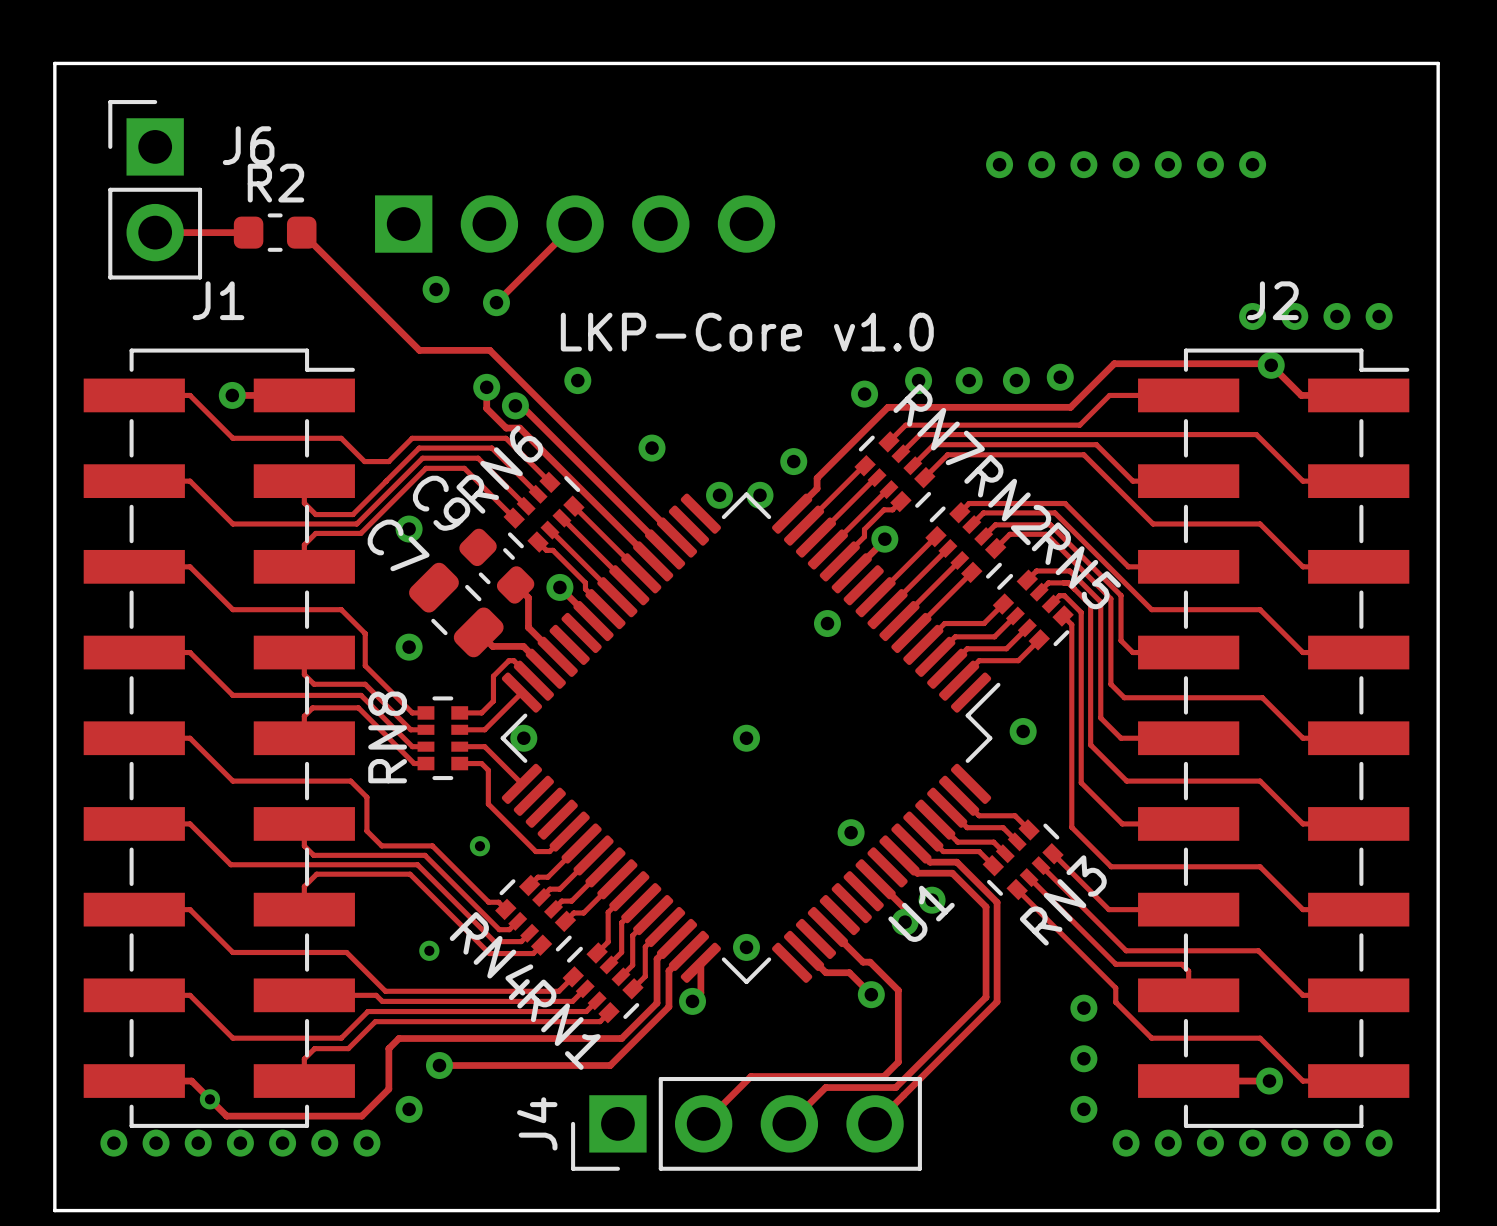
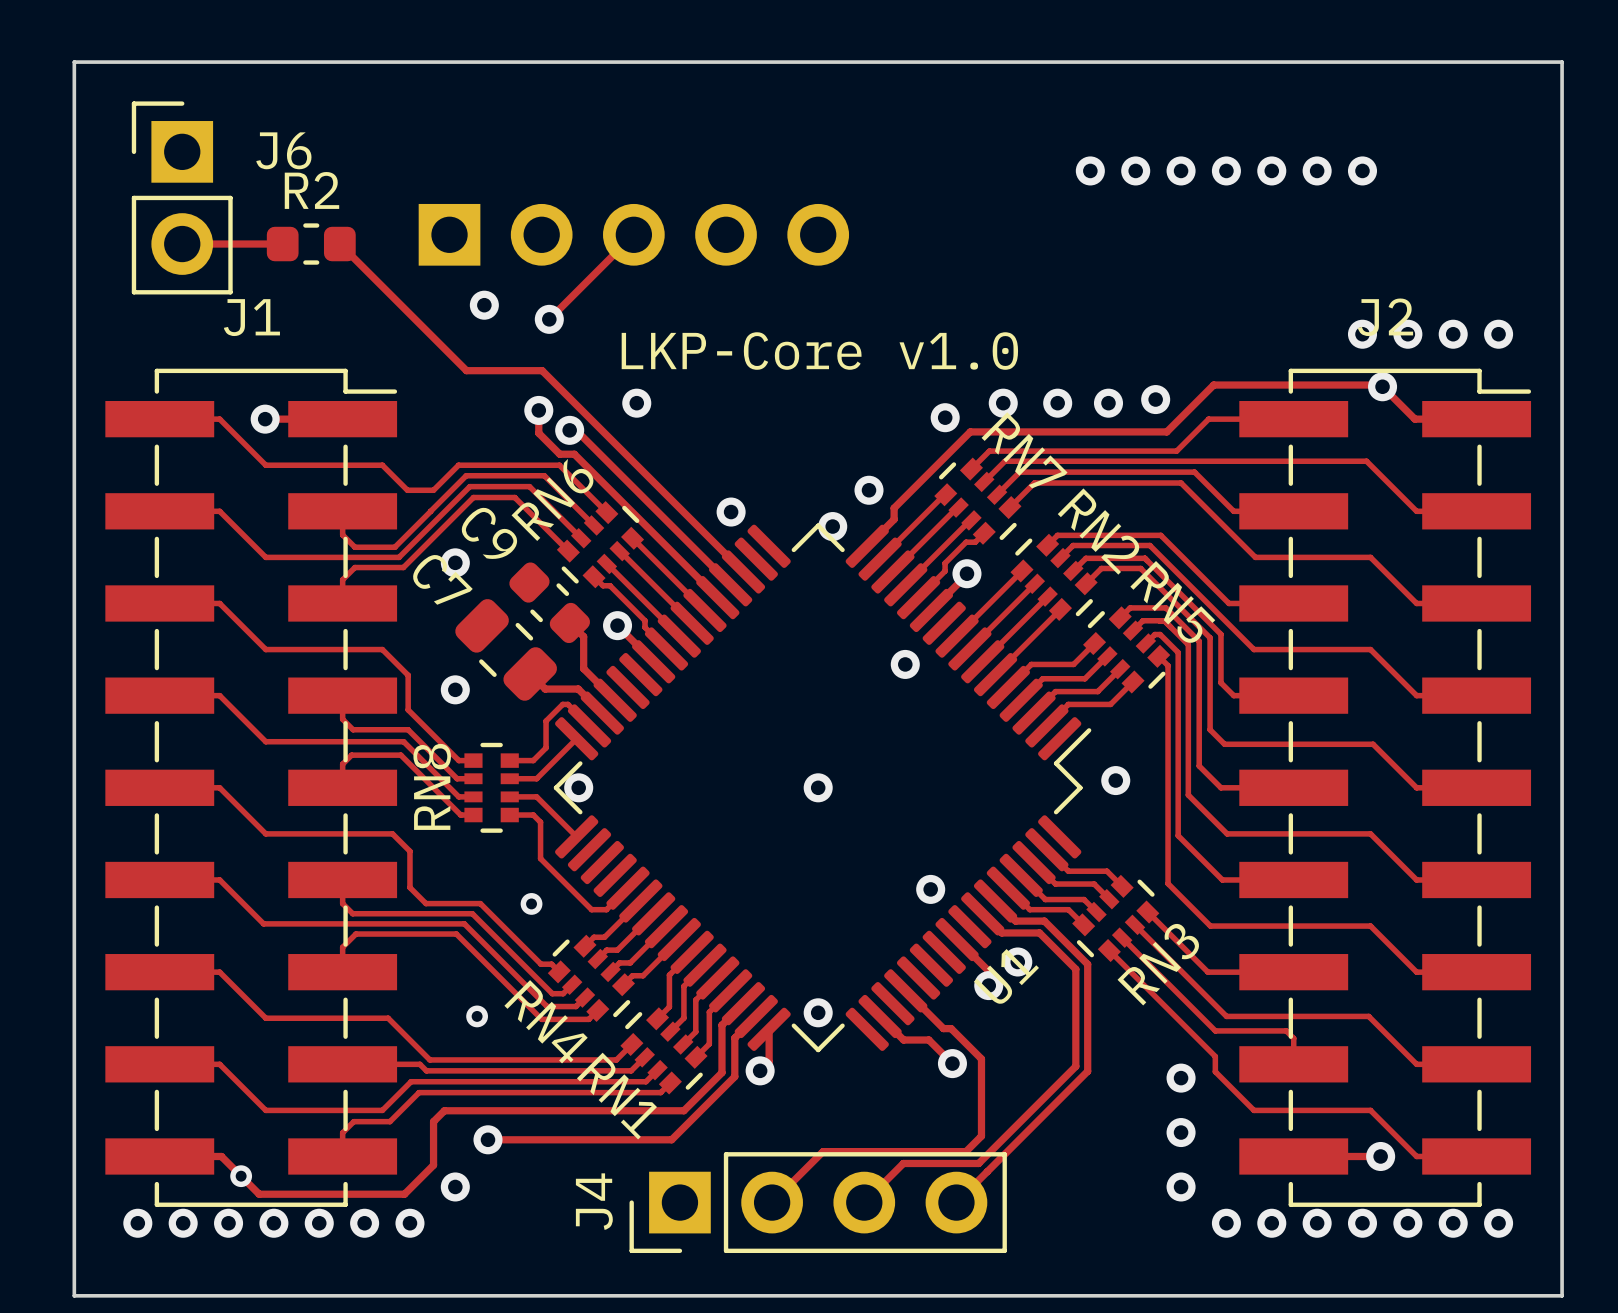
via: (652, 448) -> none
via: none -> (731, 512)
via: (719, 495) -> none

